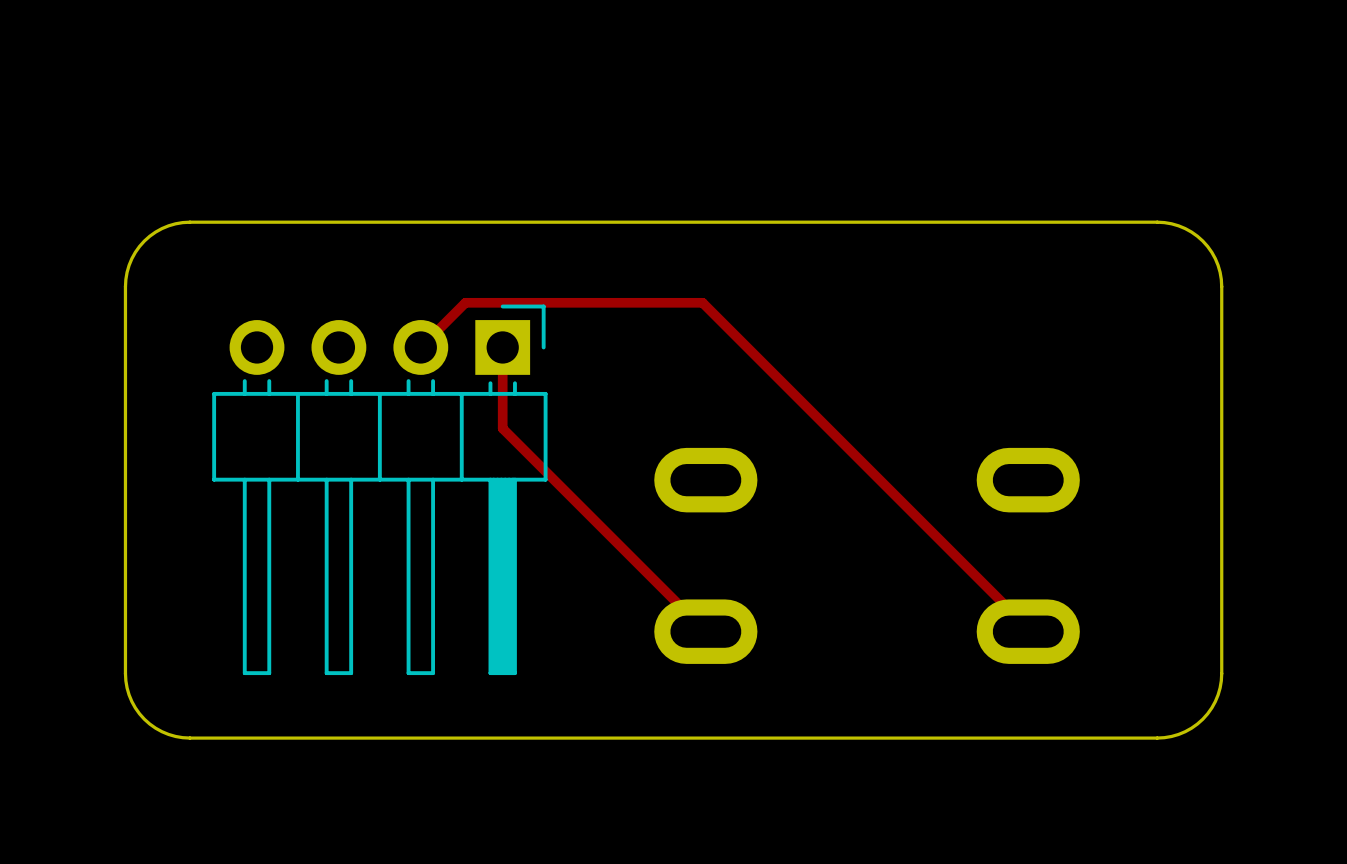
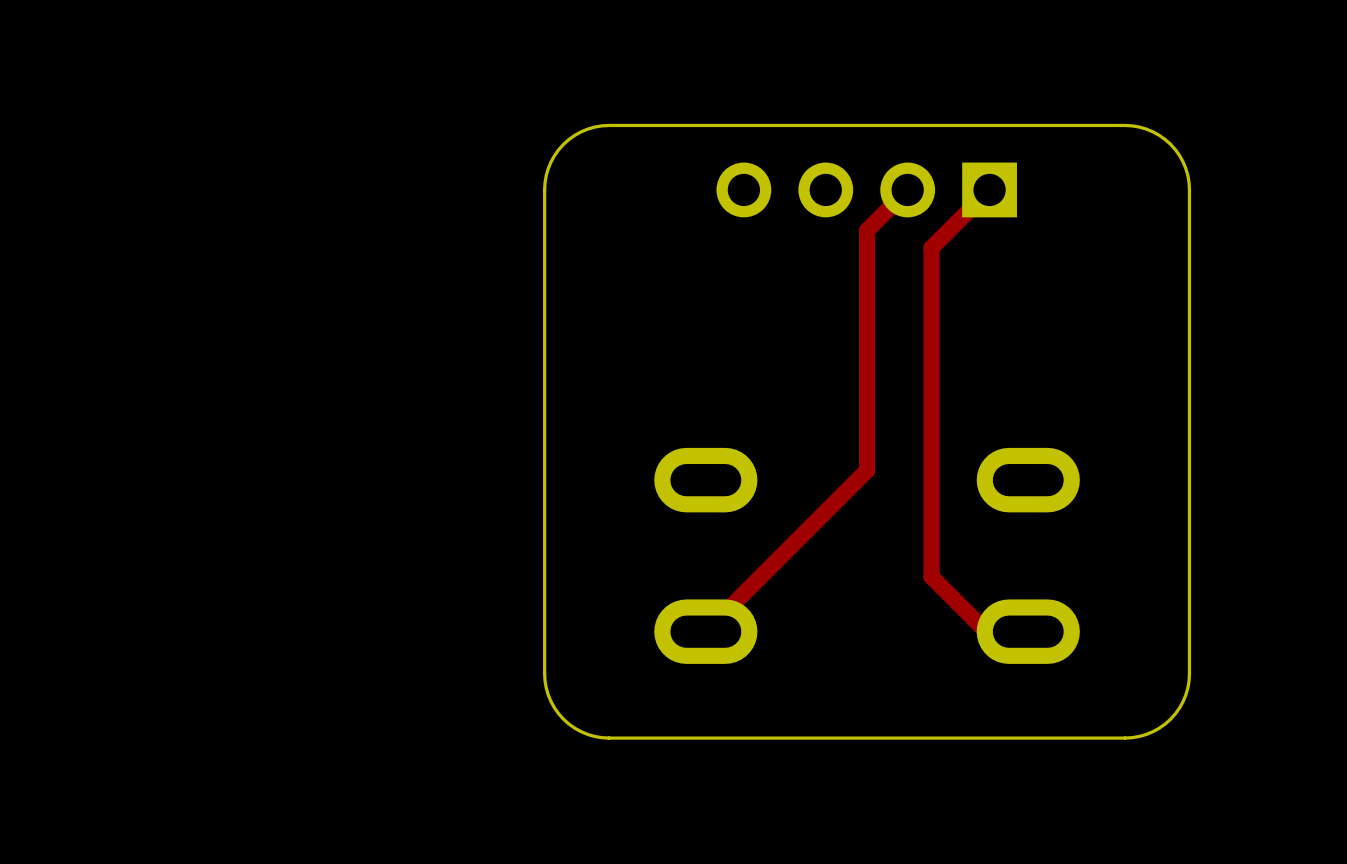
track: (420, 347) (465, 302) (702, 302) (1028, 628) (1028, 631) -> (989, 189) (931, 247) (931, 576) (986, 631) (1028, 631)
track: (502, 347) (502, 428) (705, 631) -> (907, 189) (867, 230) (867, 470) (705, 631)
part side: top (379, 489) -> bottom (866, 189)
board edge: (609, 738) (189, 738) (175, 736) (161, 731) (144, 719) (131, 701) (127, 687) (125, 673) (125, 286) (127, 272) (131, 258) (144, 241) (161, 228) (175, 223) (189, 222) (1157, 222) (1171, 223) (1185, 228) (1202, 241) (1211, 252) (1218, 265) (1221, 279) (1221, 680) (1218, 694) (1211, 707) (1202, 719) (1191, 728) (1178, 734) (1164, 737) (1125, 738) -> (609, 738) (587, 734) (574, 728) (563, 719) (554, 707) (548, 694) (544, 673) (545, 182) (551, 161) (558, 149) (568, 139) (587, 129) (609, 125) (1125, 125) (1139, 127) (1152, 131) (1165, 139) (1175, 149) (1185, 168) (1189, 189) (1189, 680) (1183, 701) (1175, 713) (1165, 724) (1146, 734) (1125, 738)

